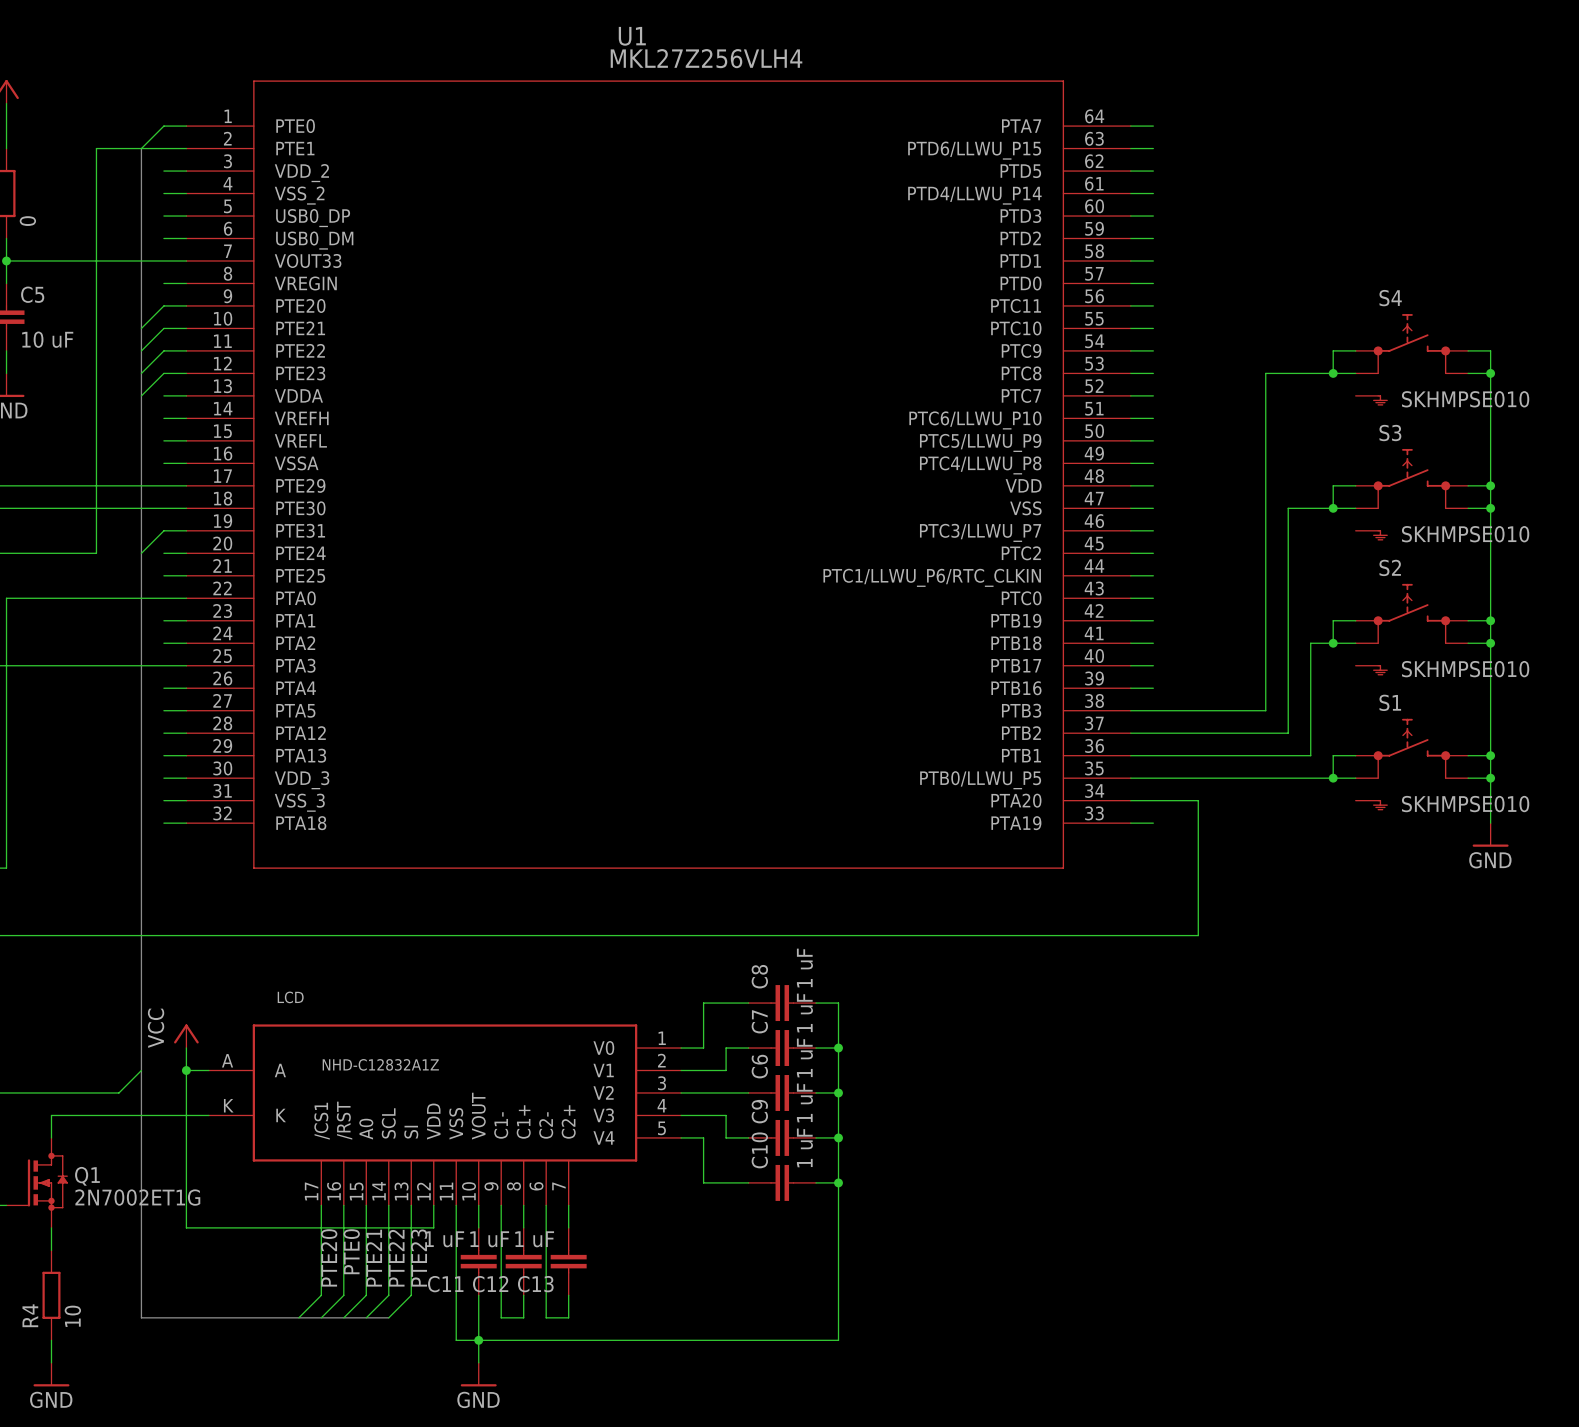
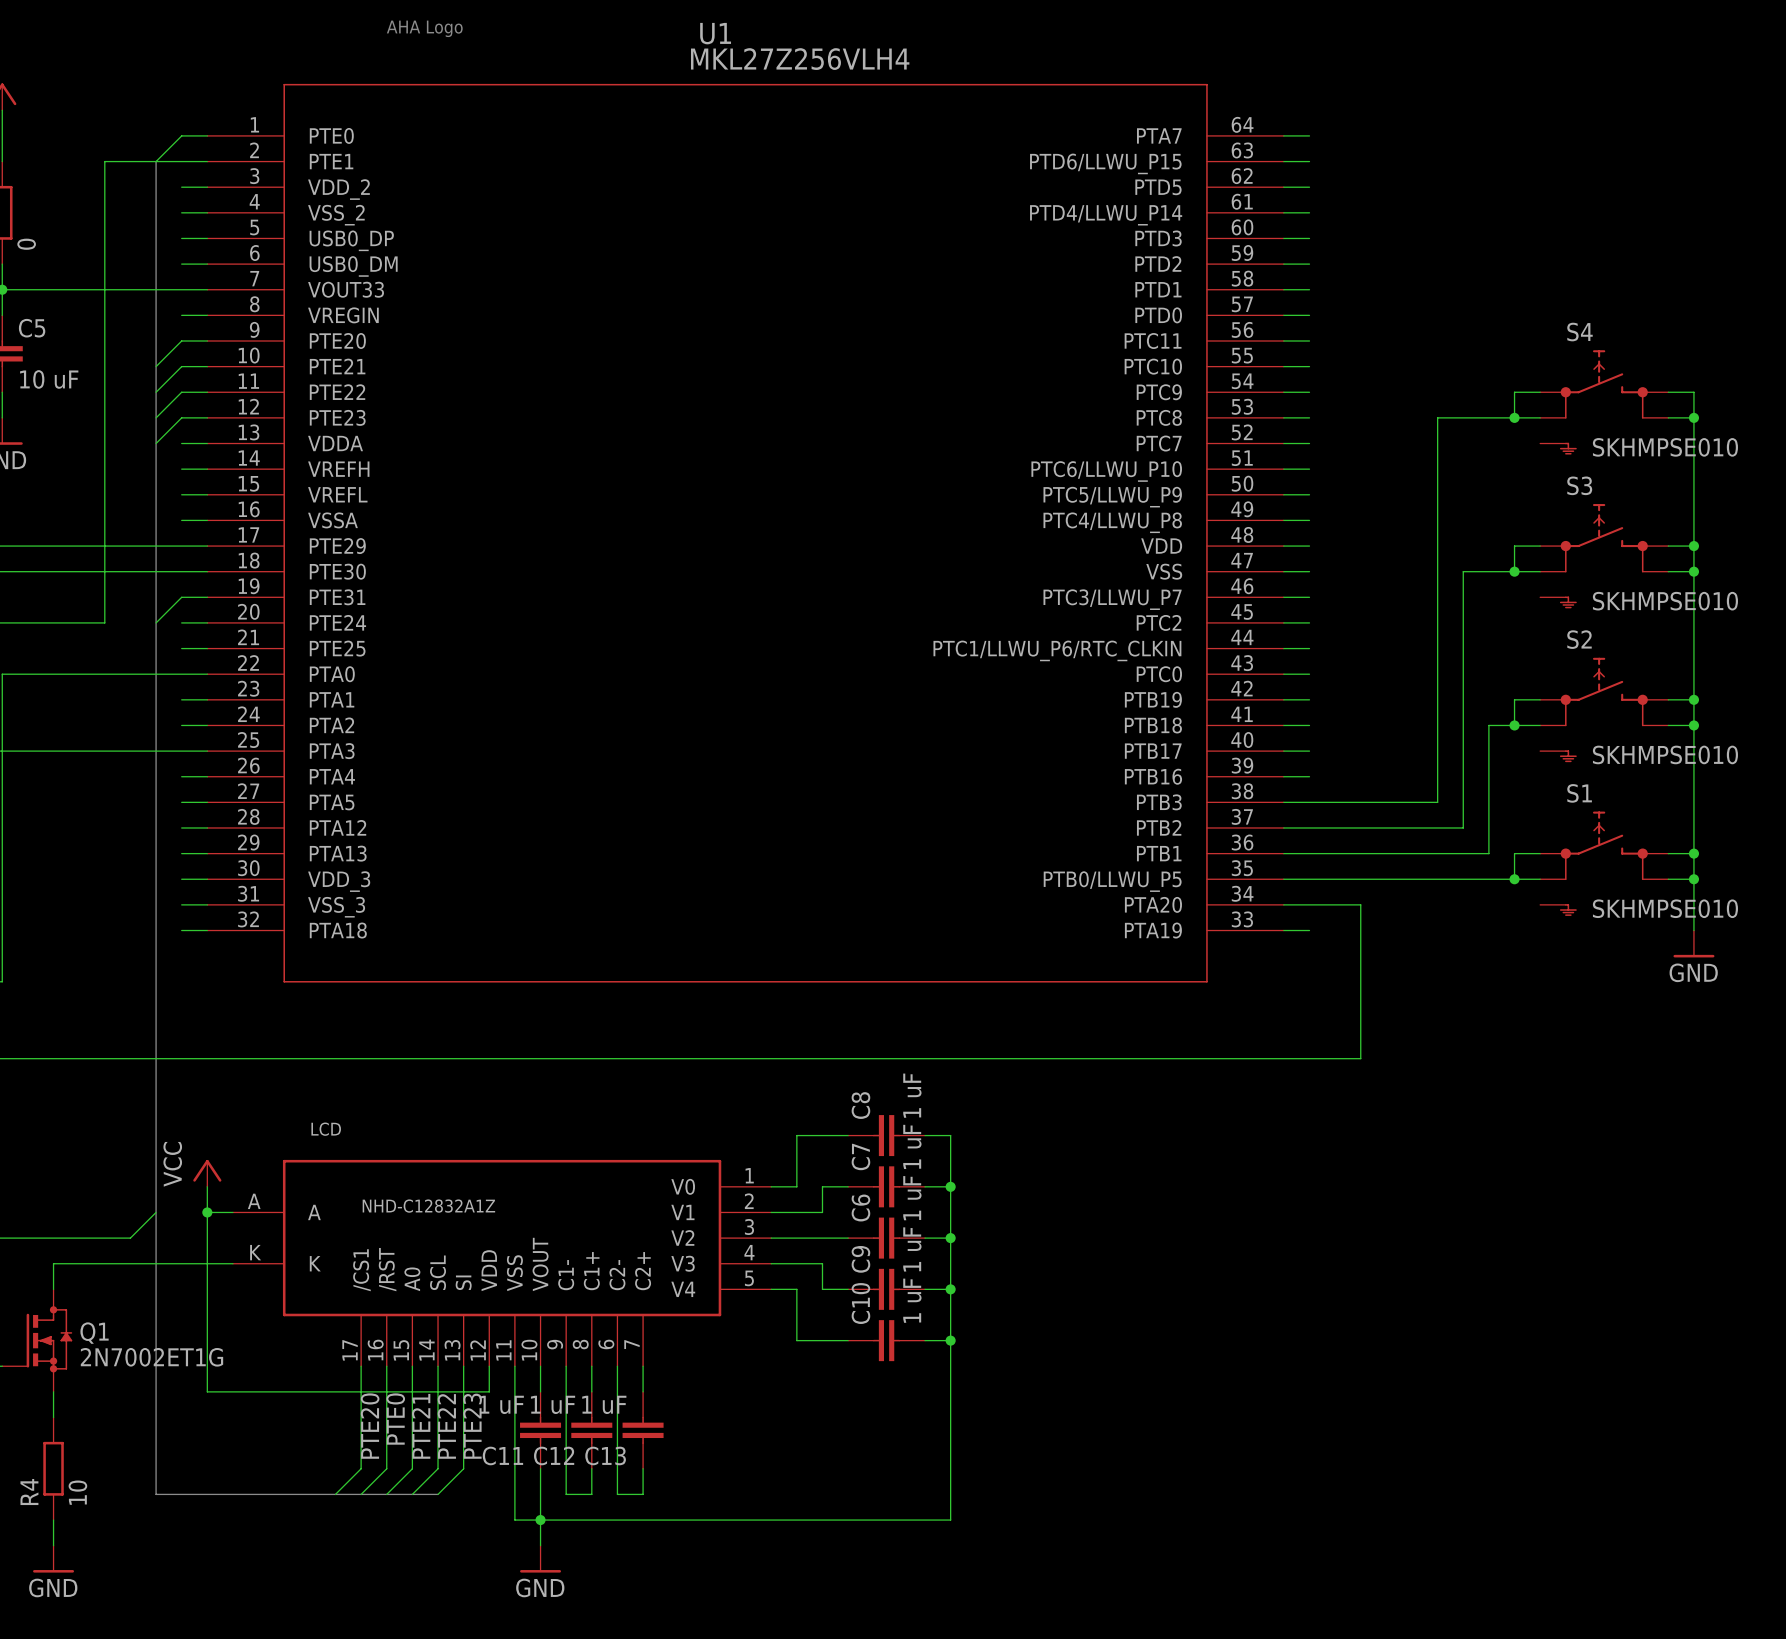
part: none -> (424, 28)

